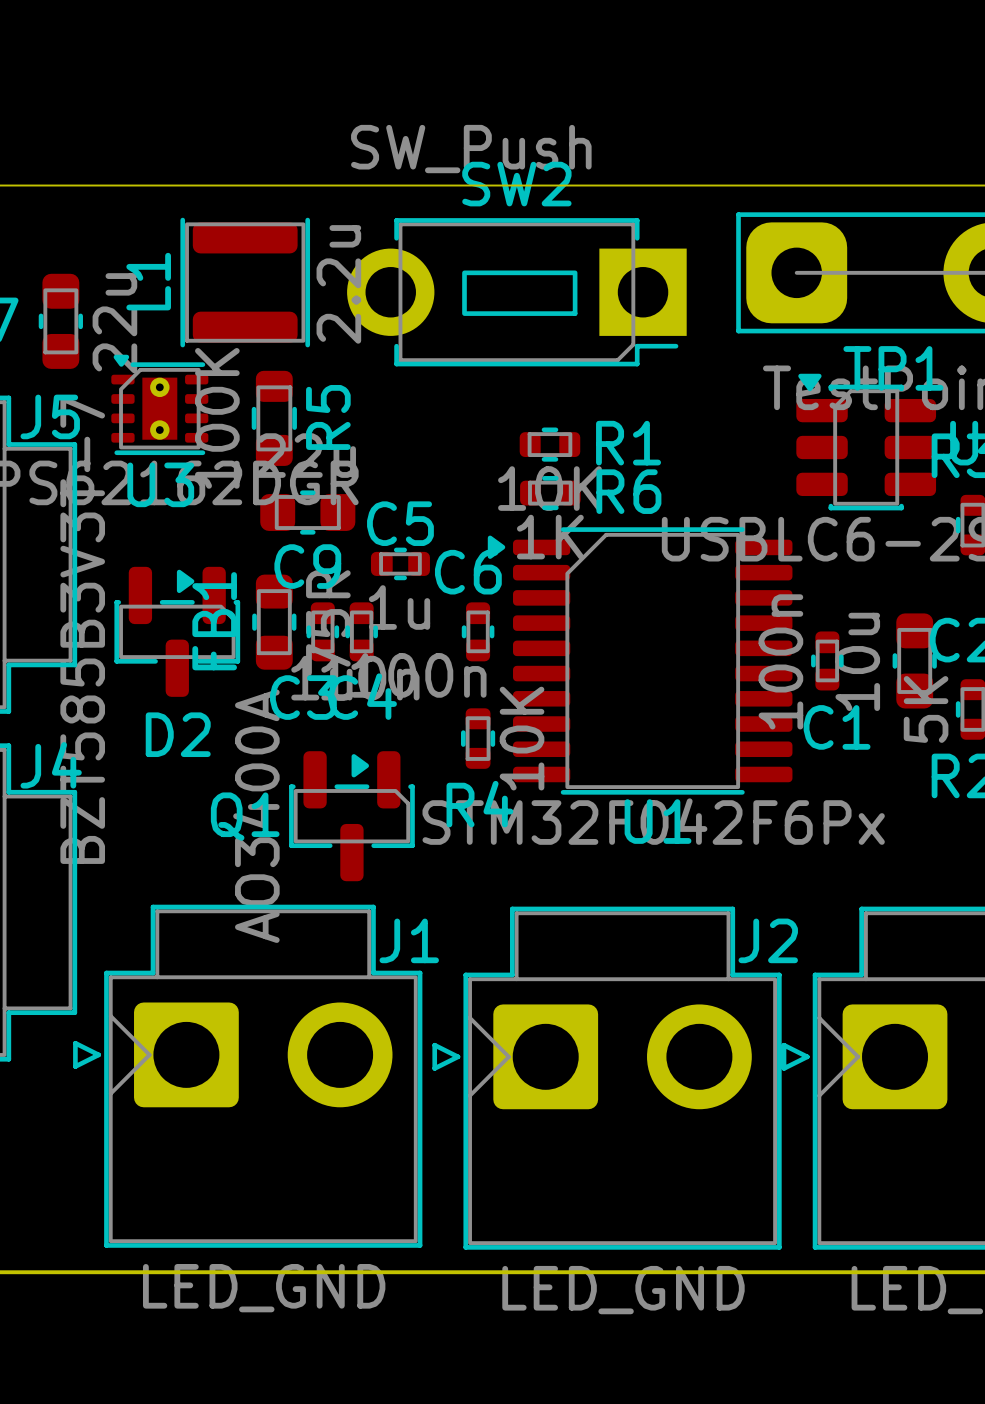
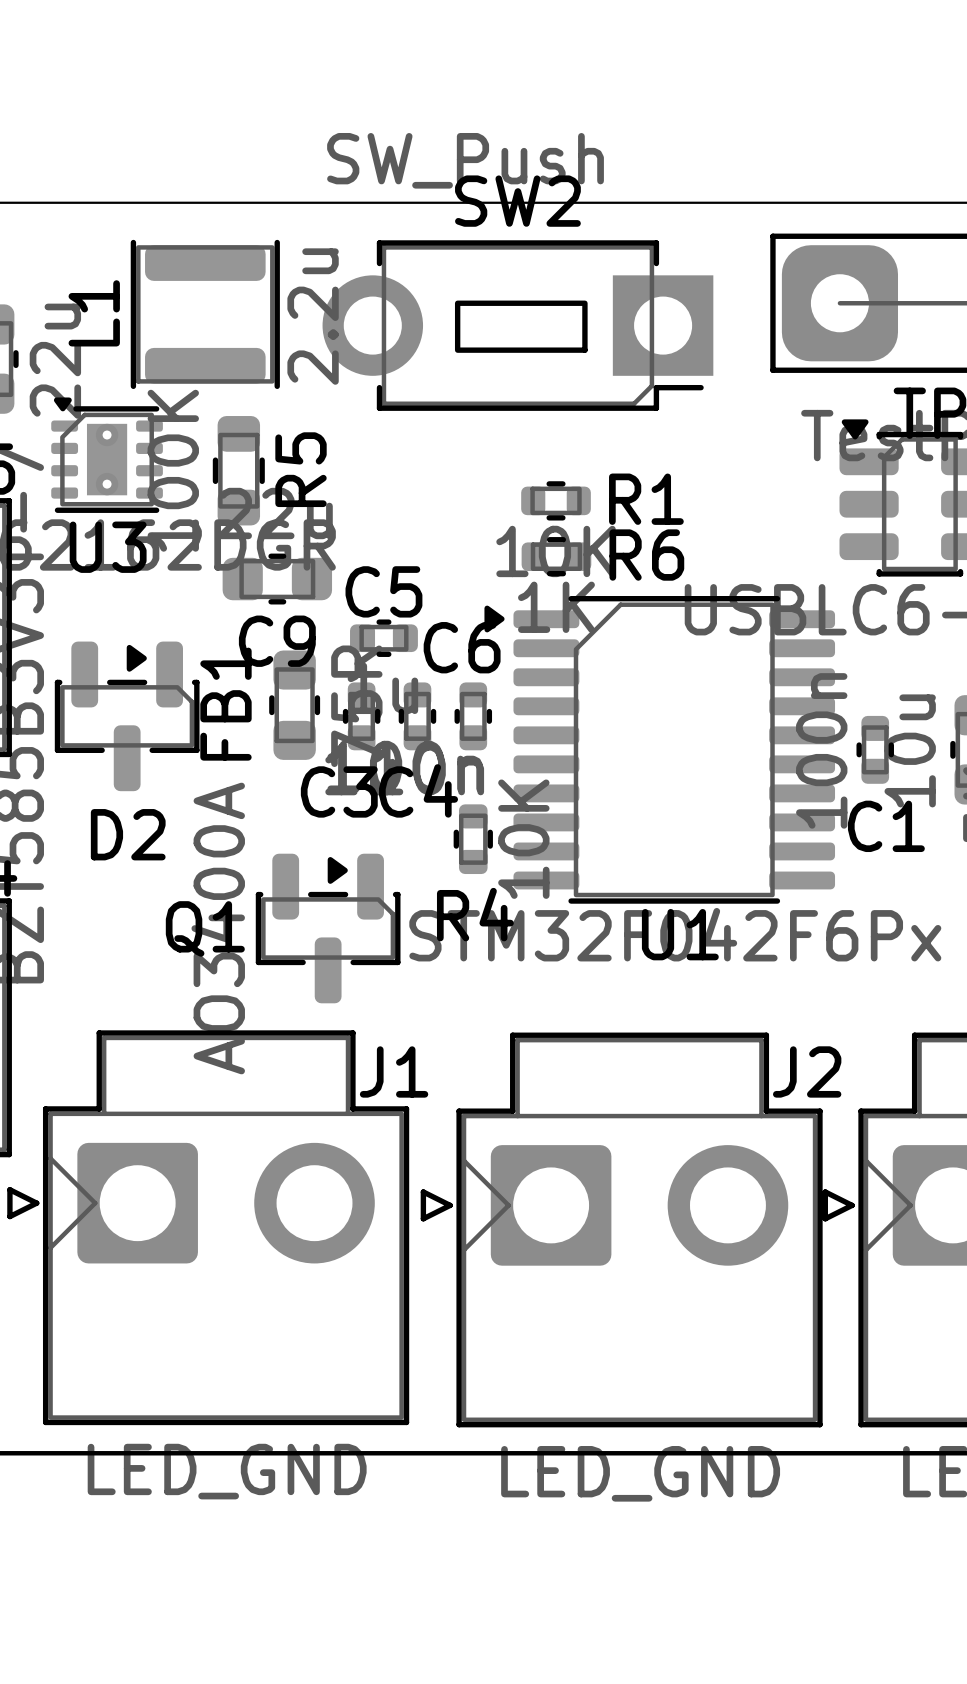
FB1 position: (274, 622) -> (294, 705)
C3 position: (322, 631) -> (361, 716)
C4 position: (361, 631) -> (417, 716)

